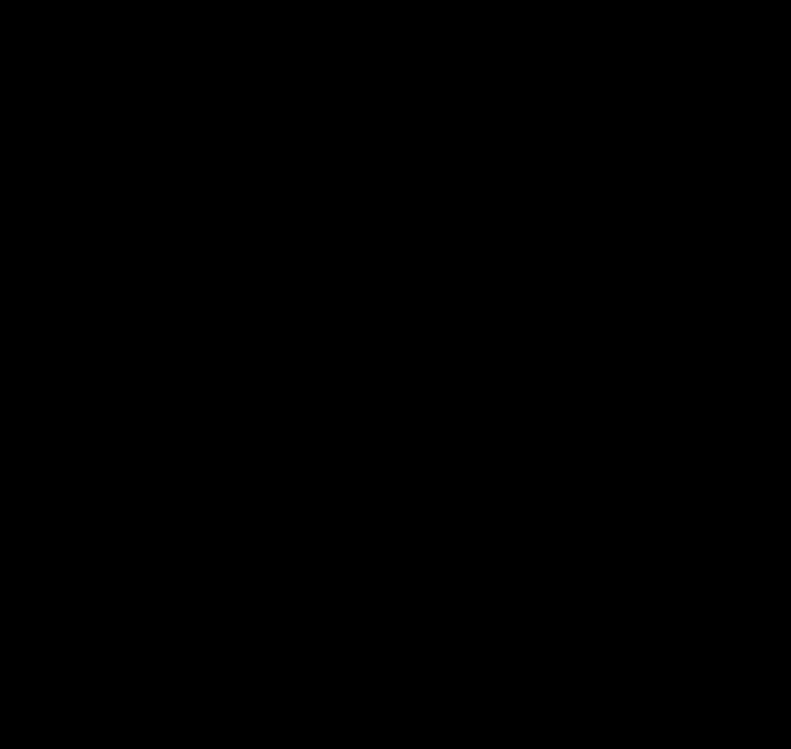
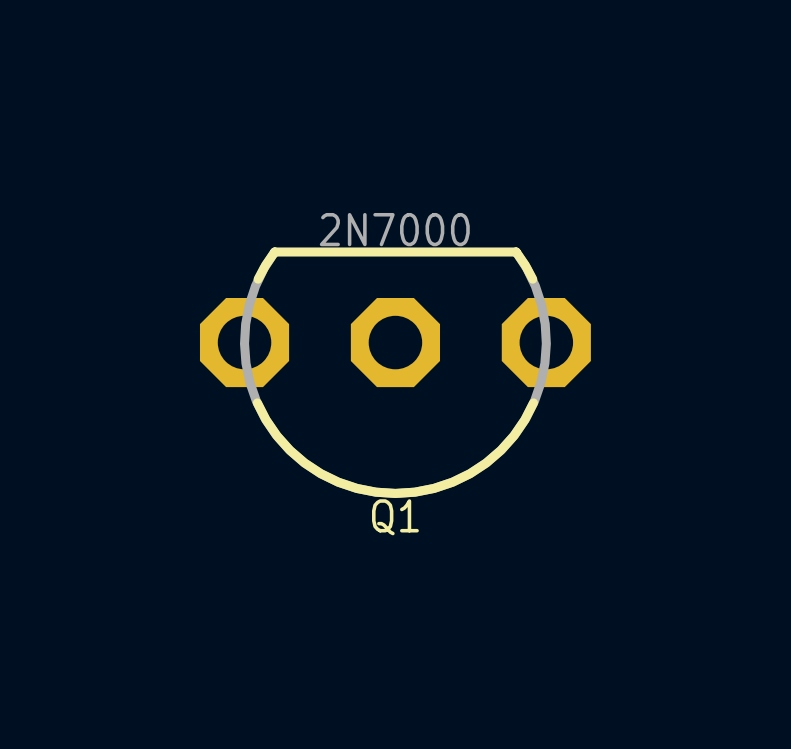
Q1: none -> 2N7000 (395, 372)

